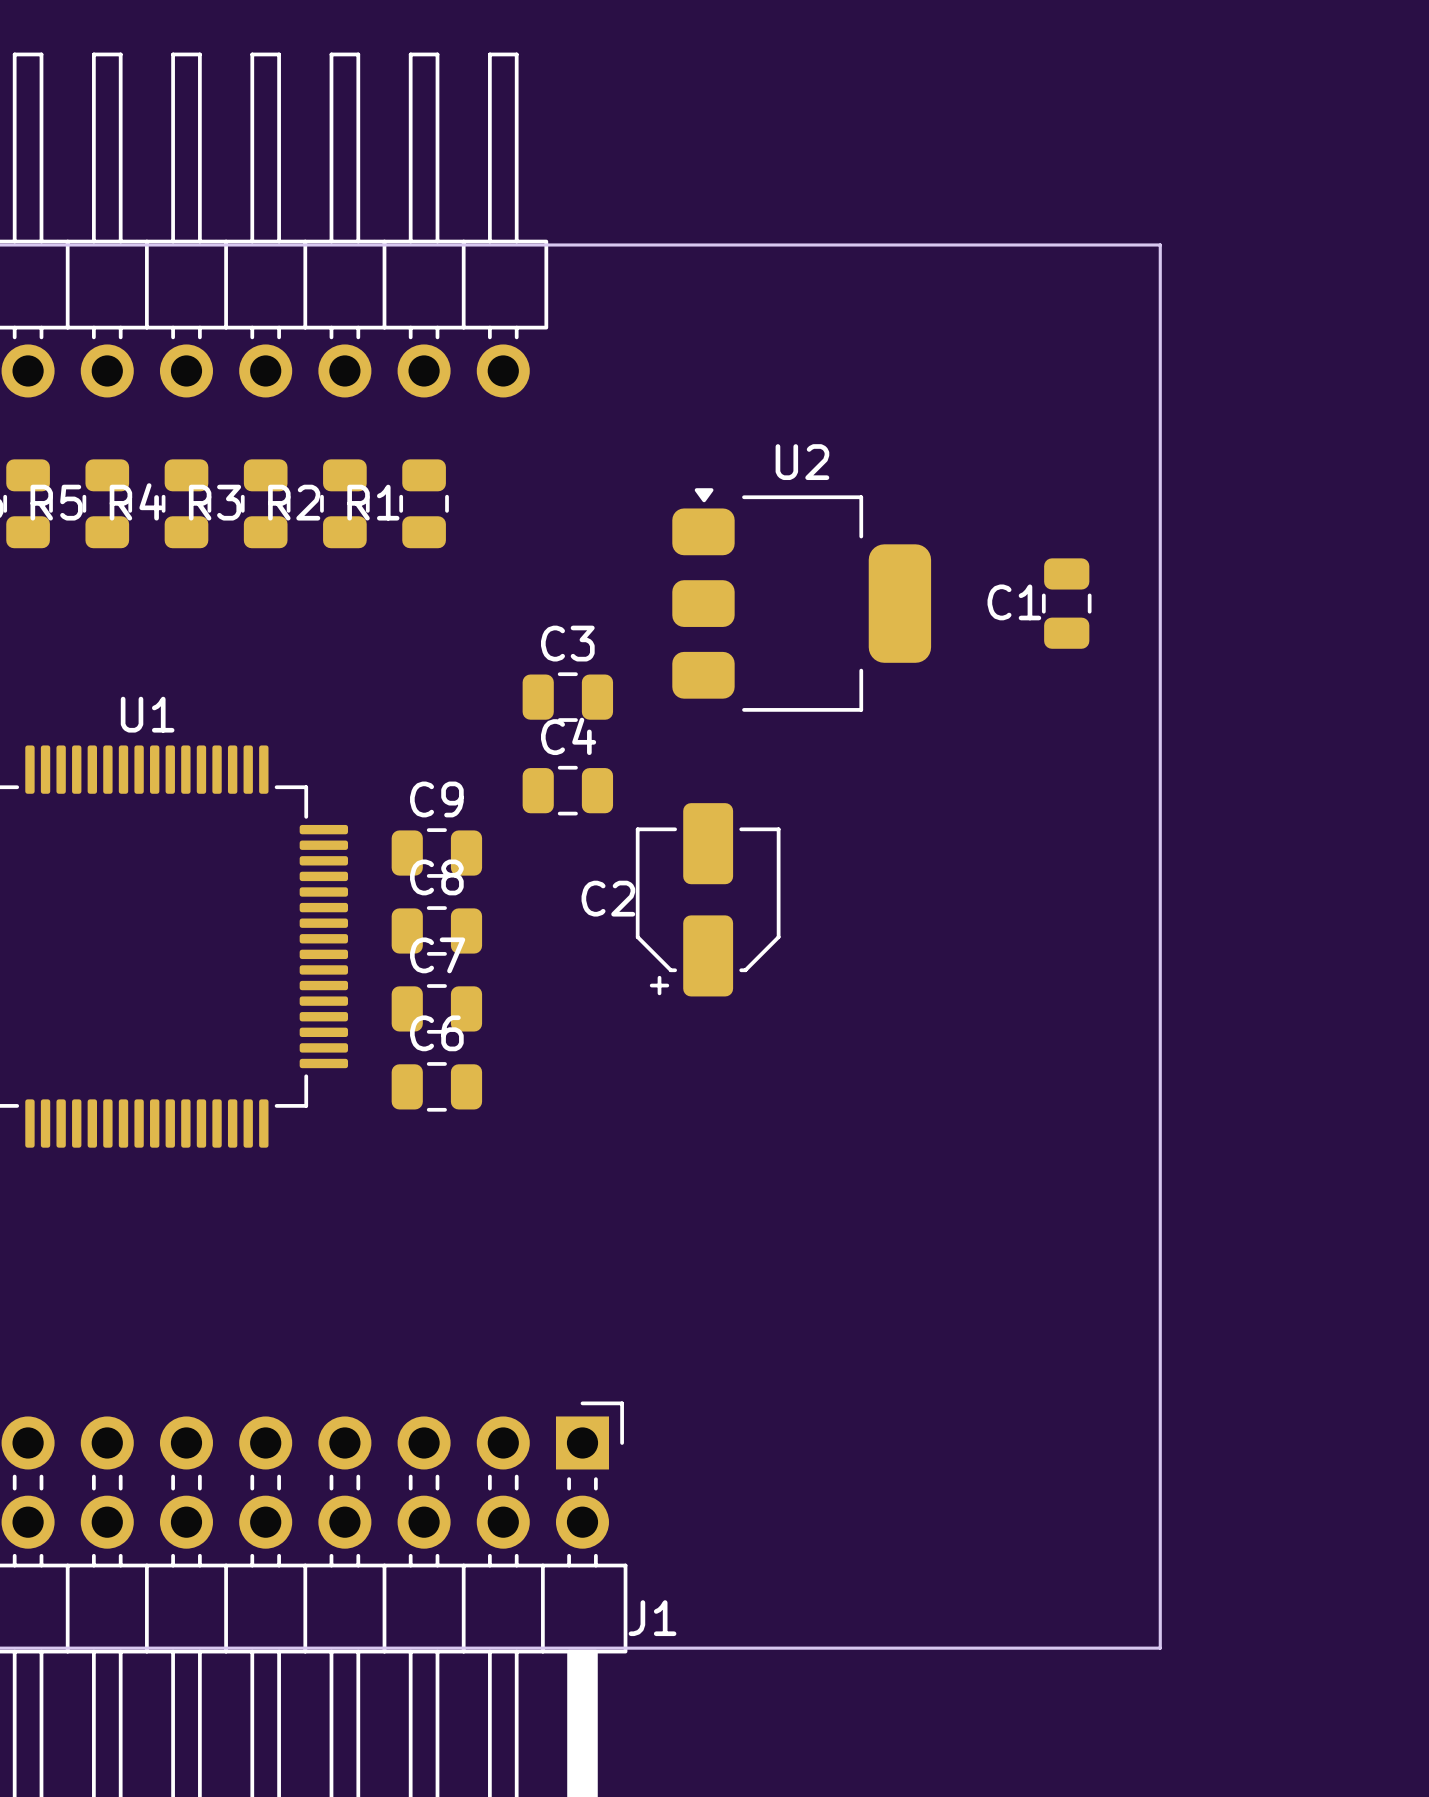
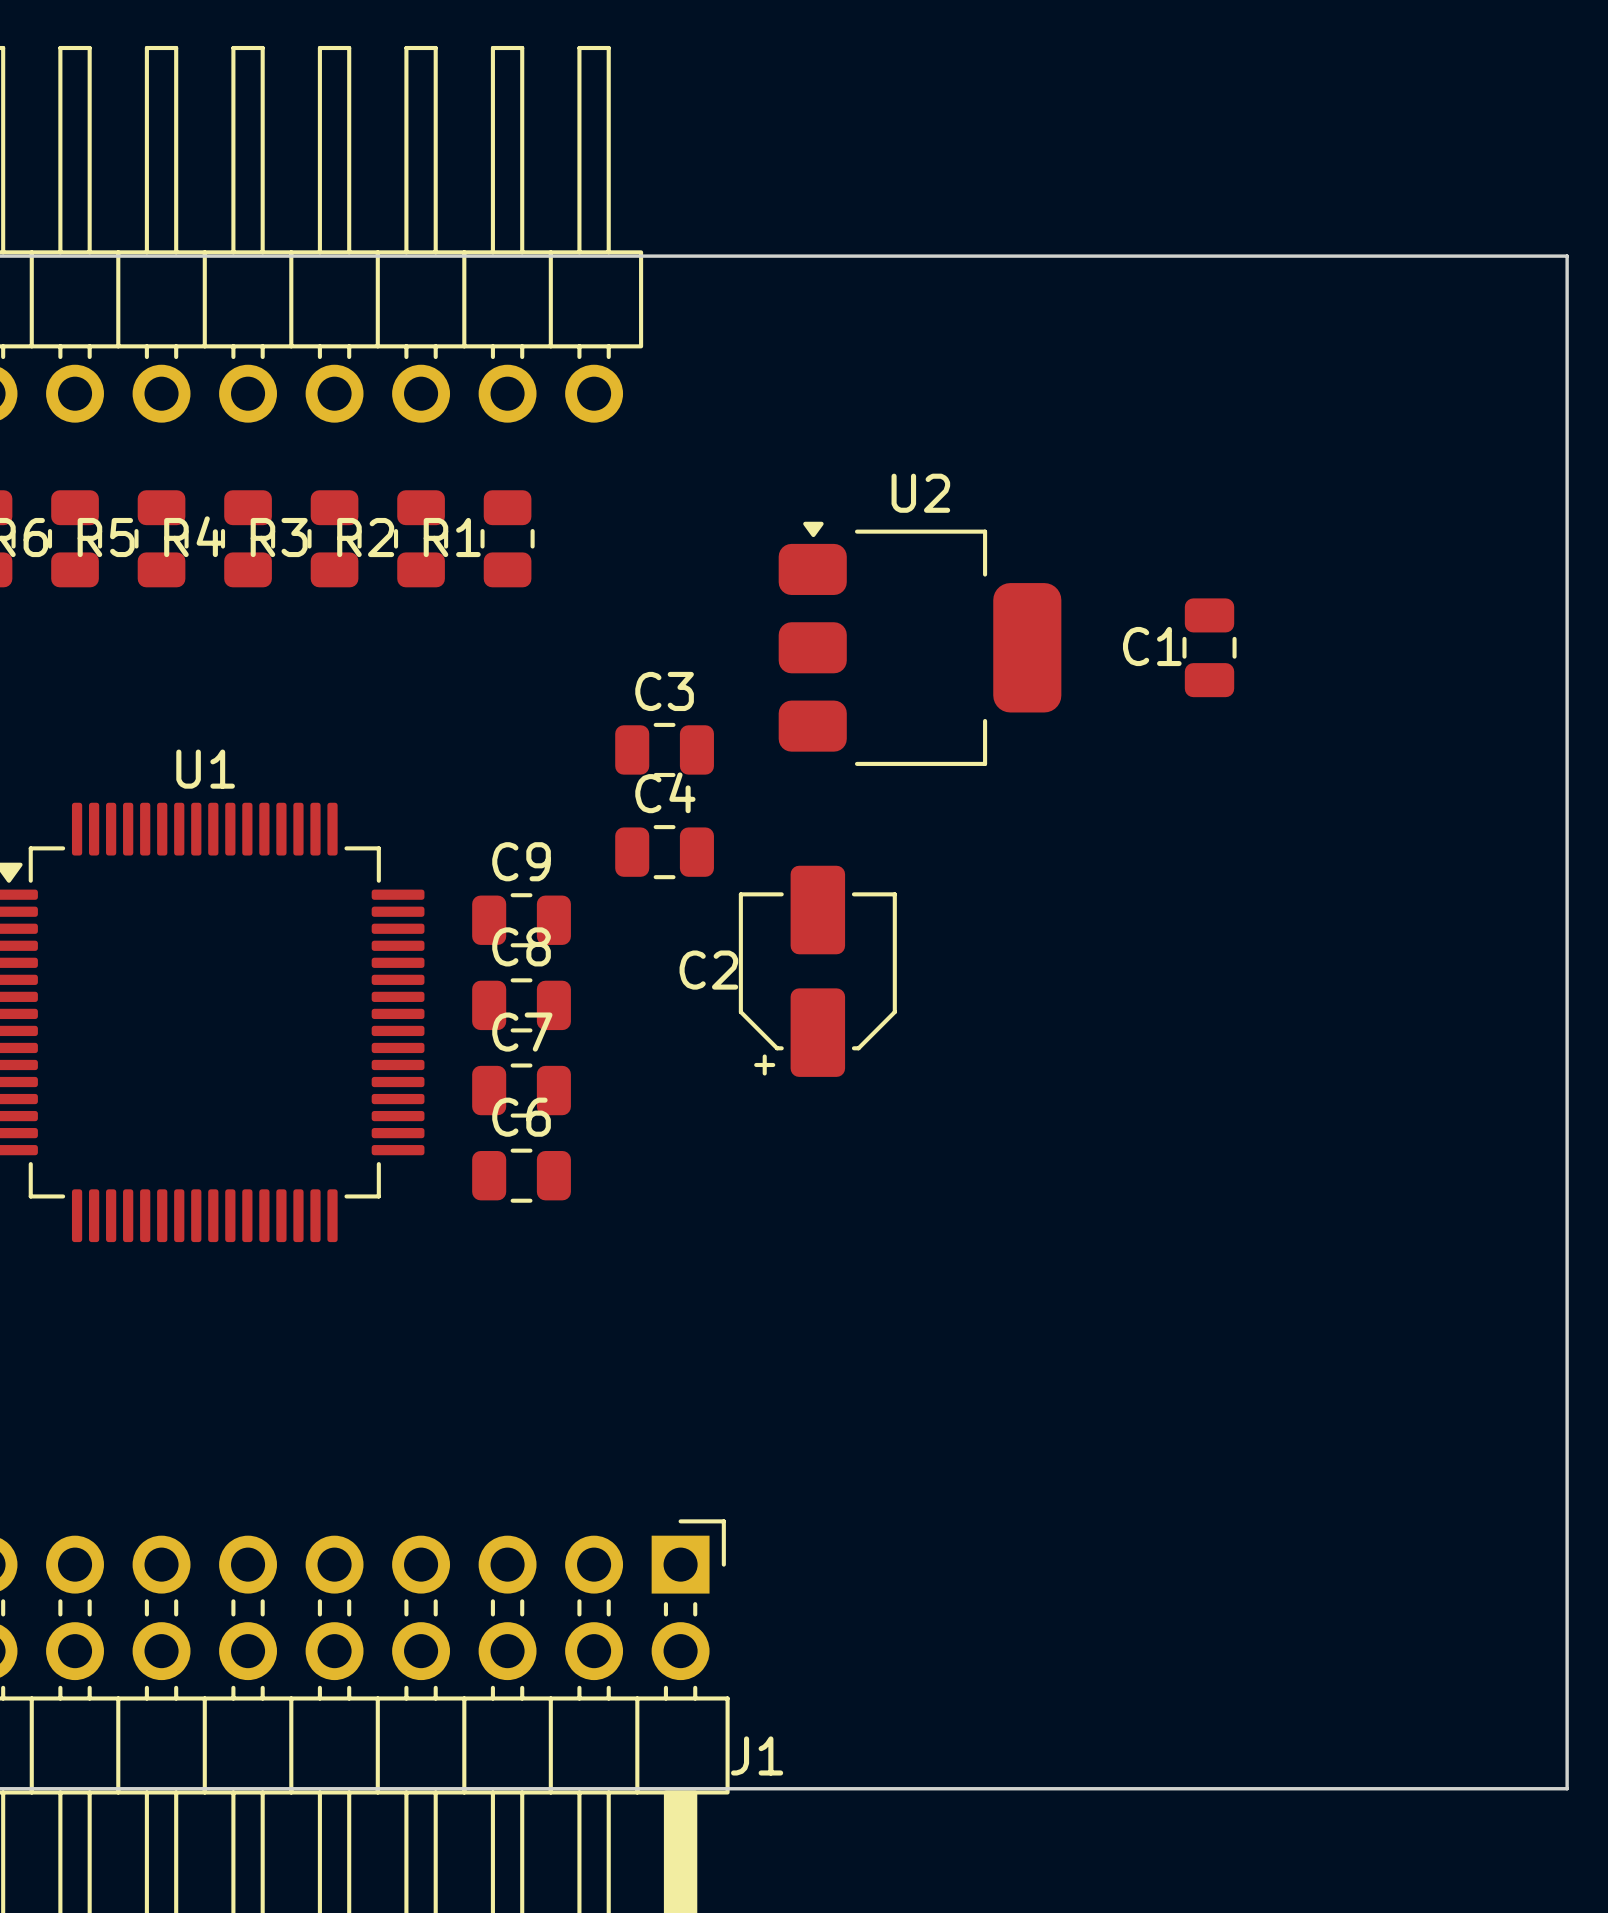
board edge: (1160, 244) (1160, 1648) -> (1311, 256) (1567, 256) (1567, 1788) (1311, 1788)

